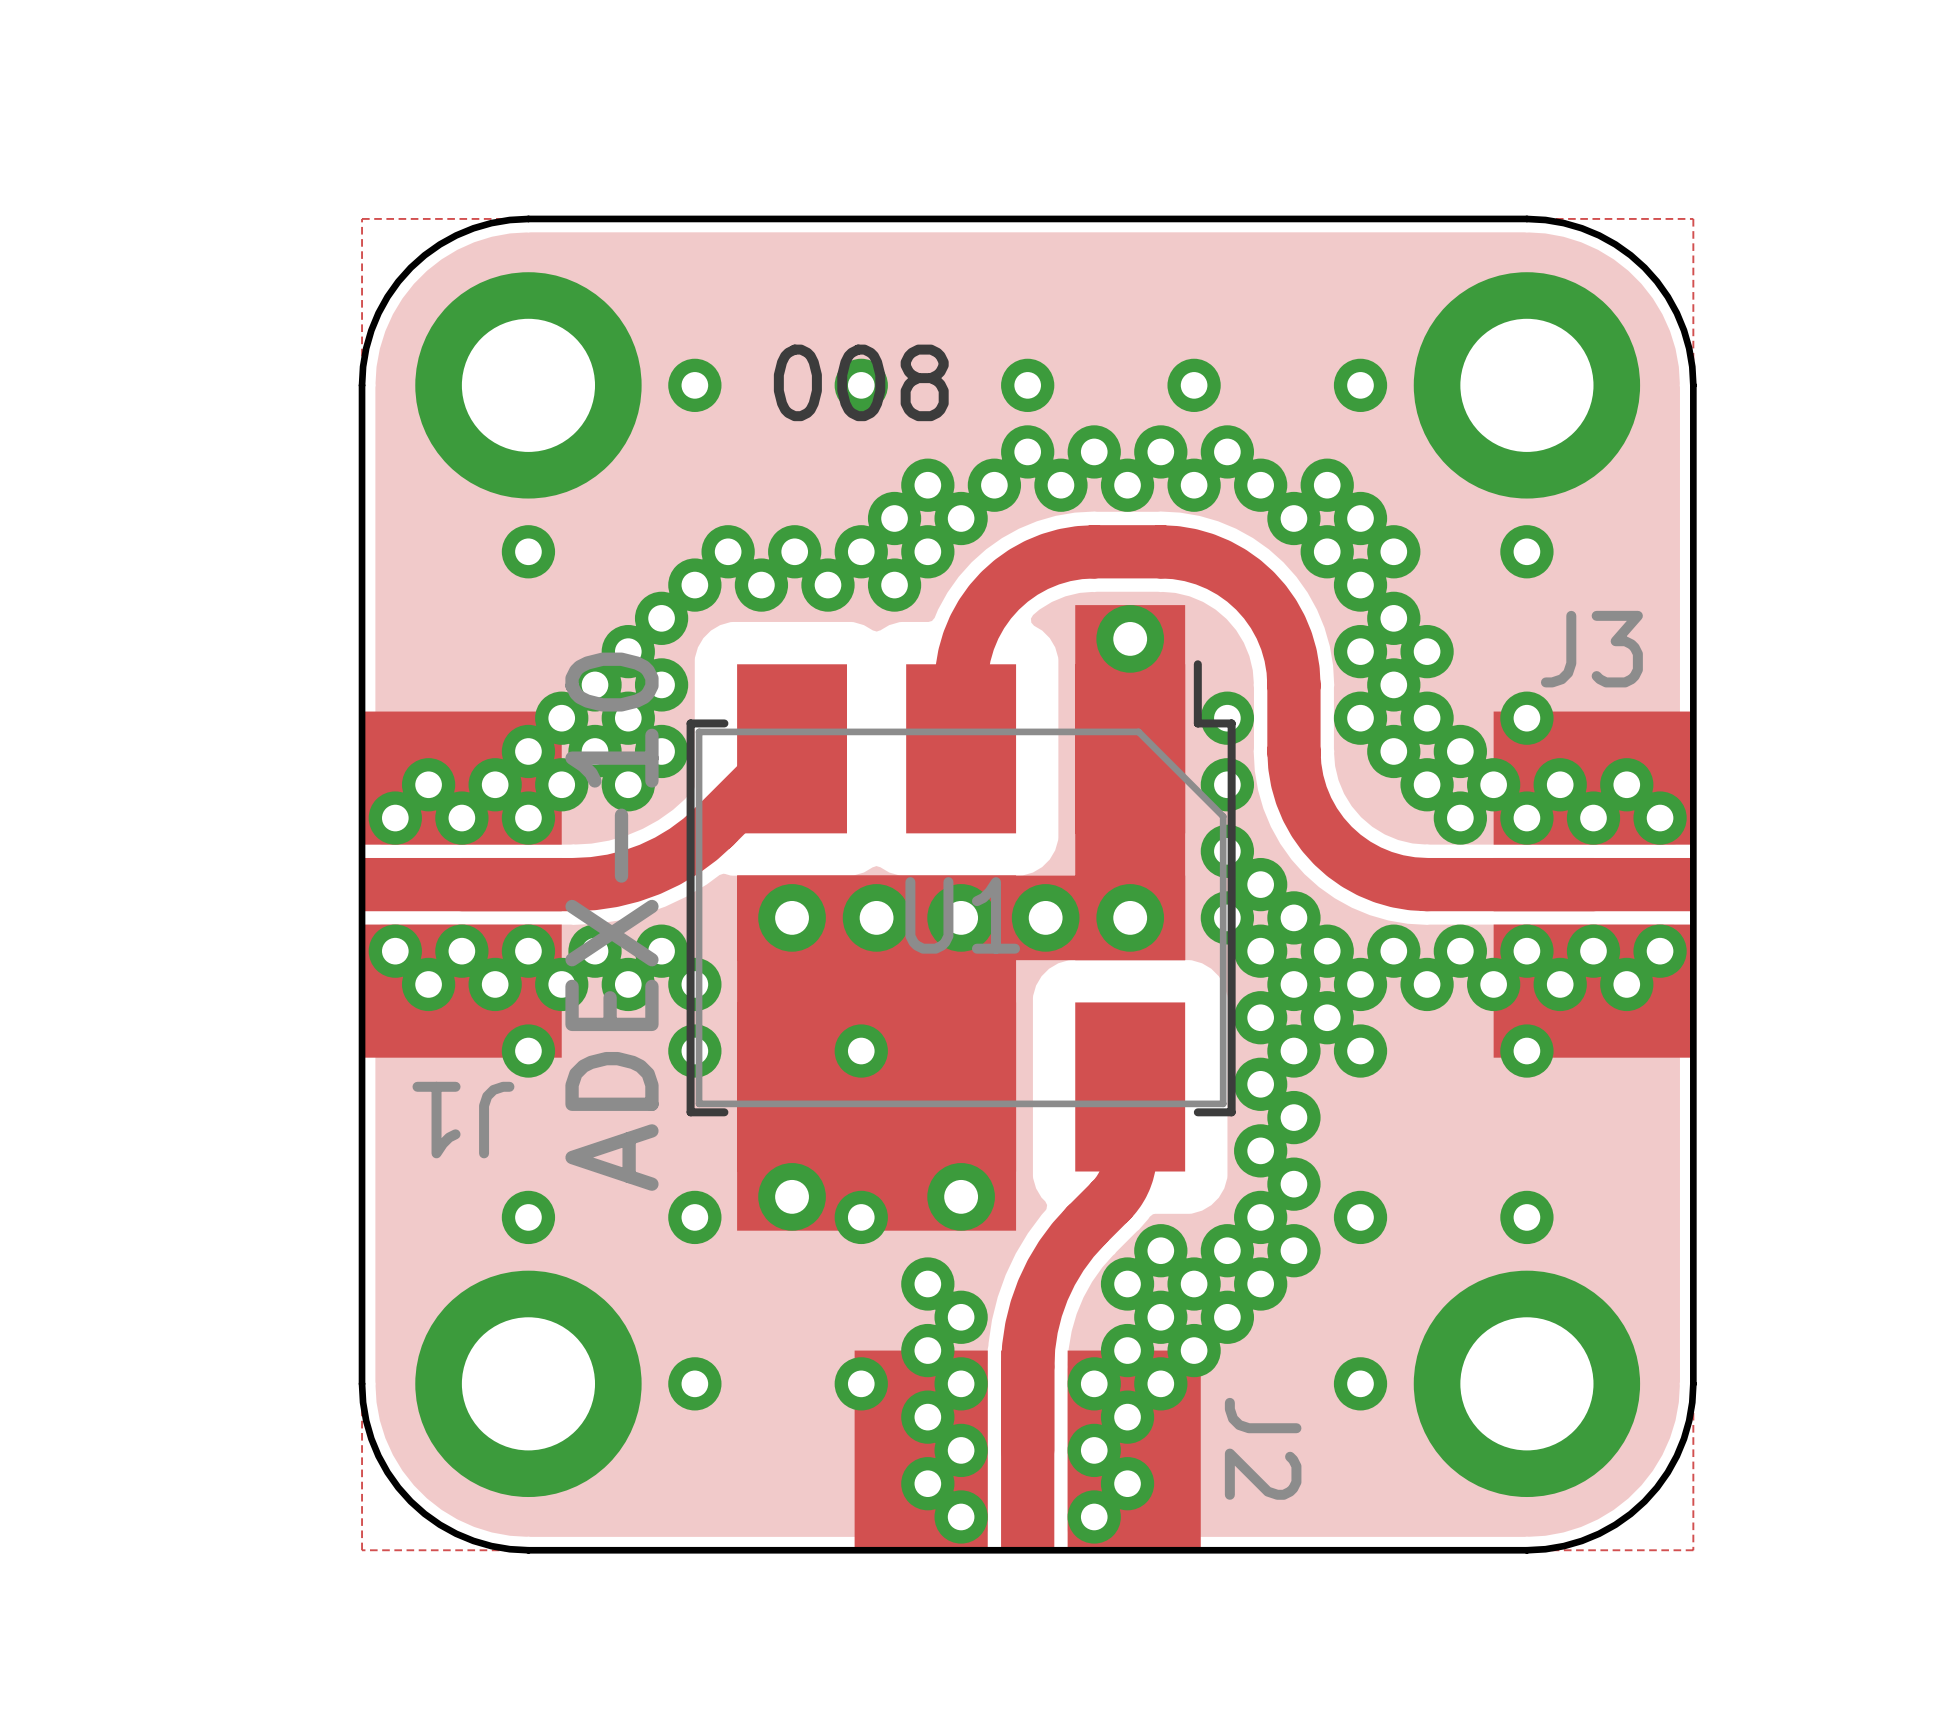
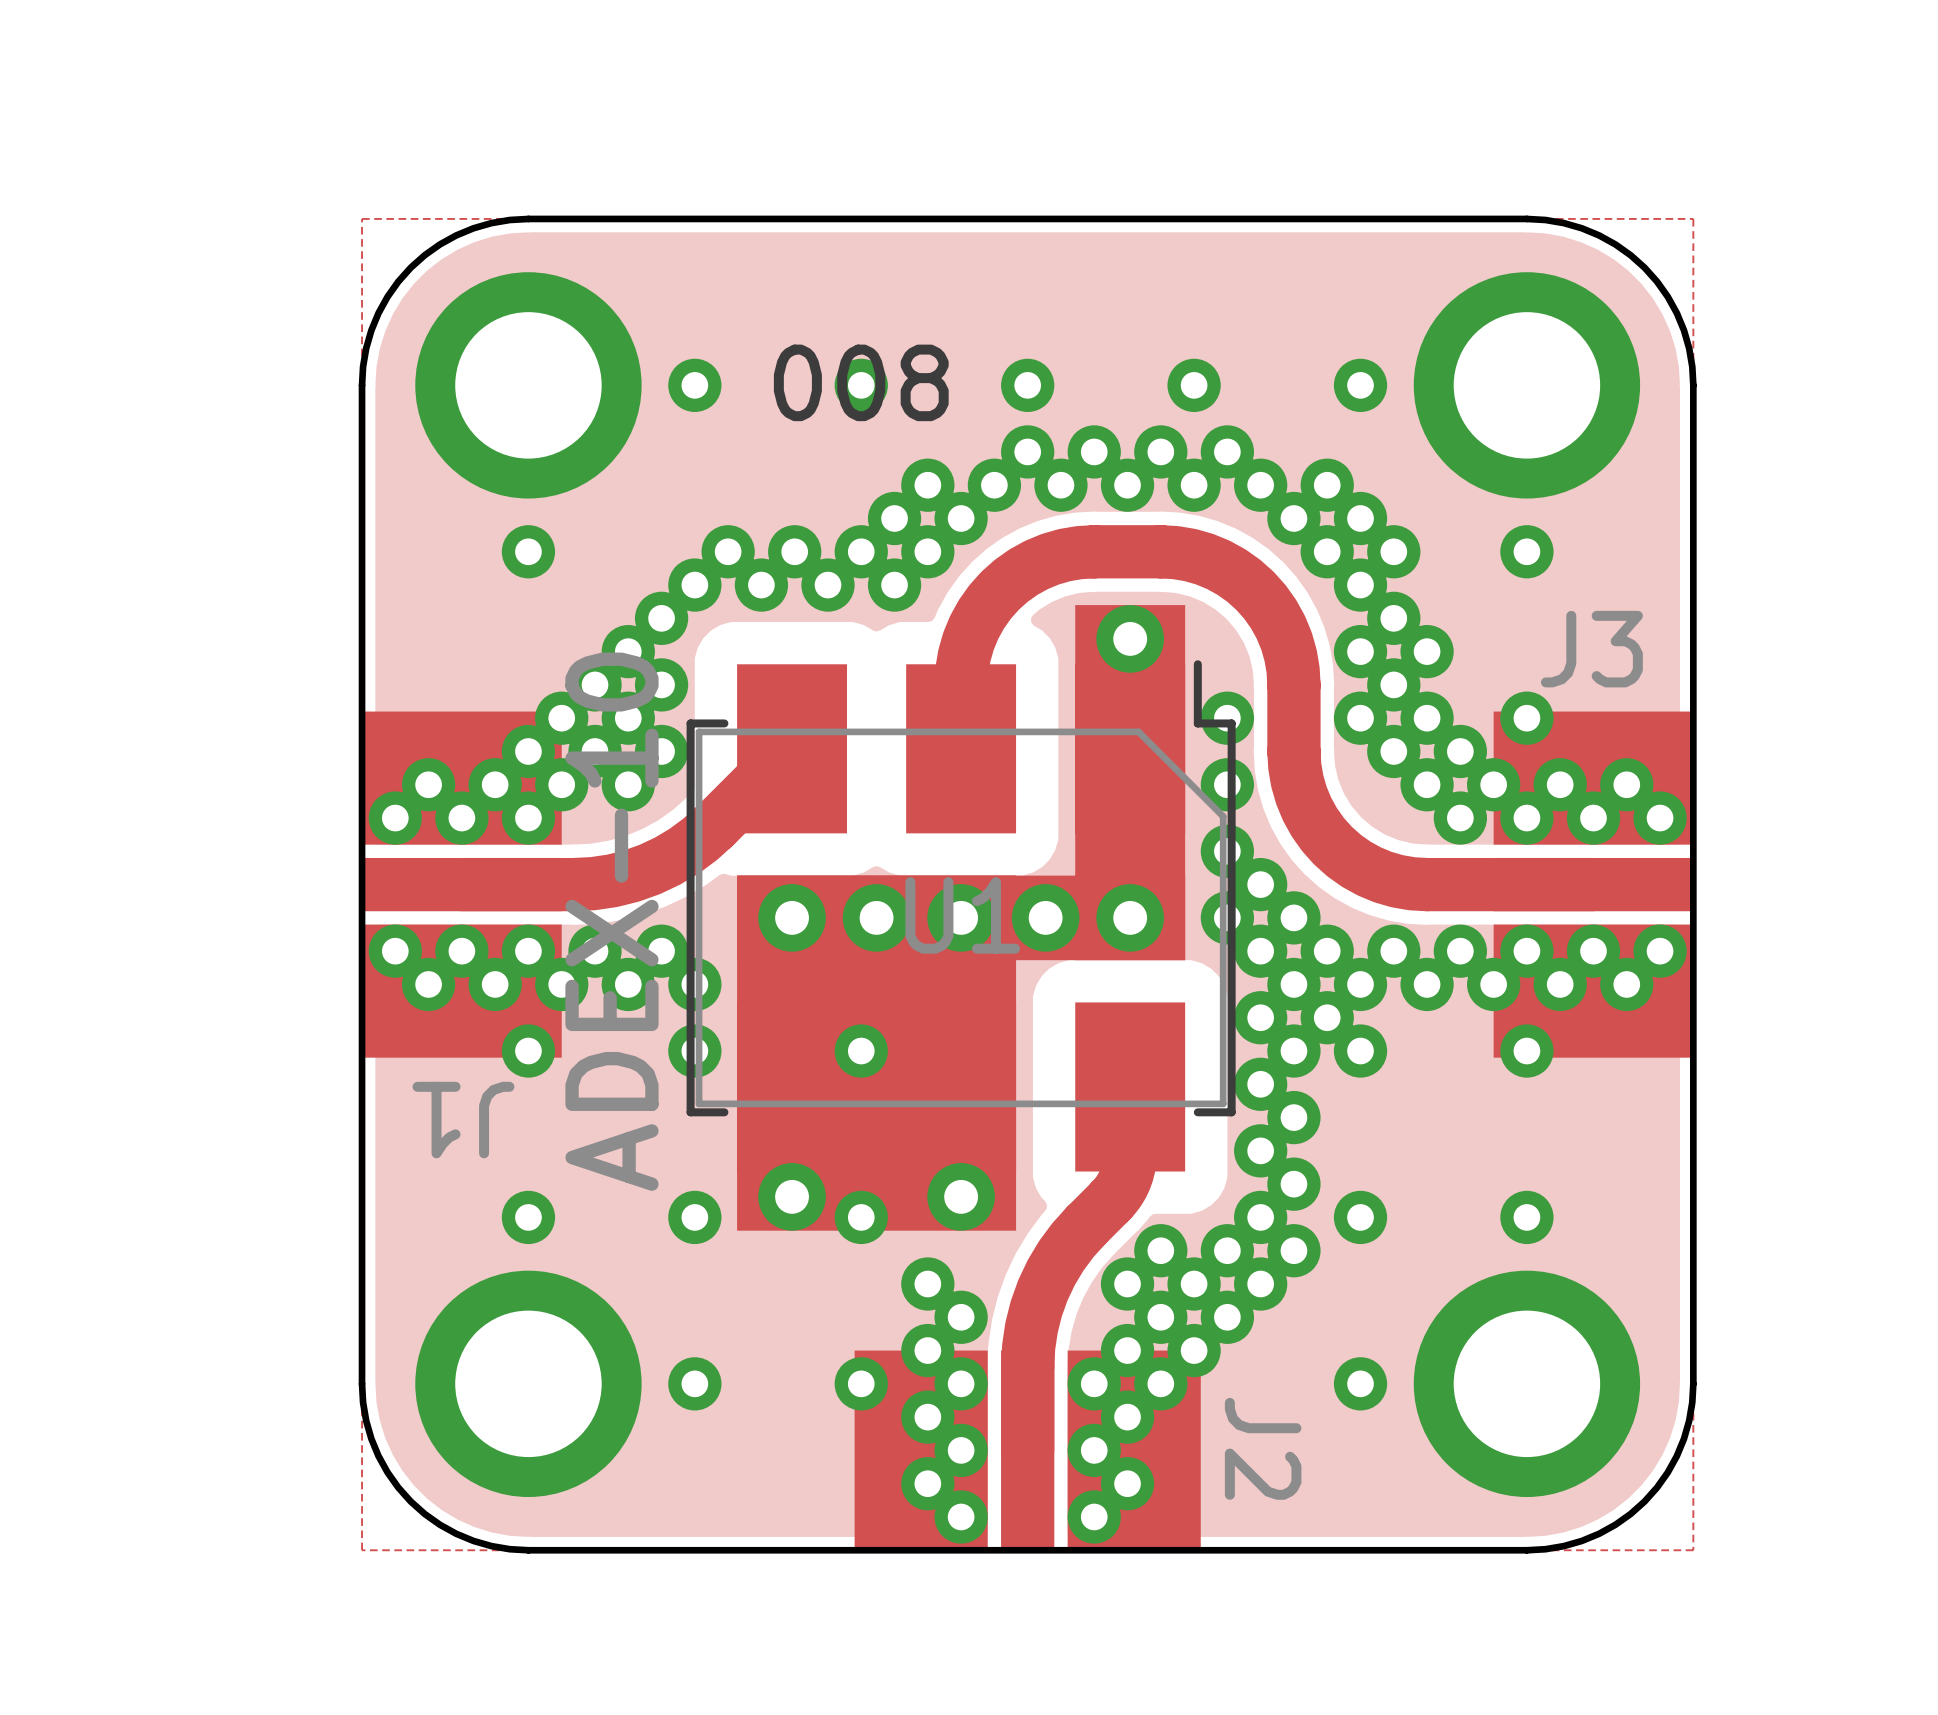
part footprint: [415, 272, 642, 499] -> [415, 272, 642, 499]
part footprint: [1413, 272, 1641, 499] -> [1413, 272, 1641, 499]
part footprint: [415, 1270, 642, 1498] -> [415, 1270, 642, 1498]
part footprint: [1413, 1270, 1641, 1498] -> [1413, 1270, 1641, 1498]

